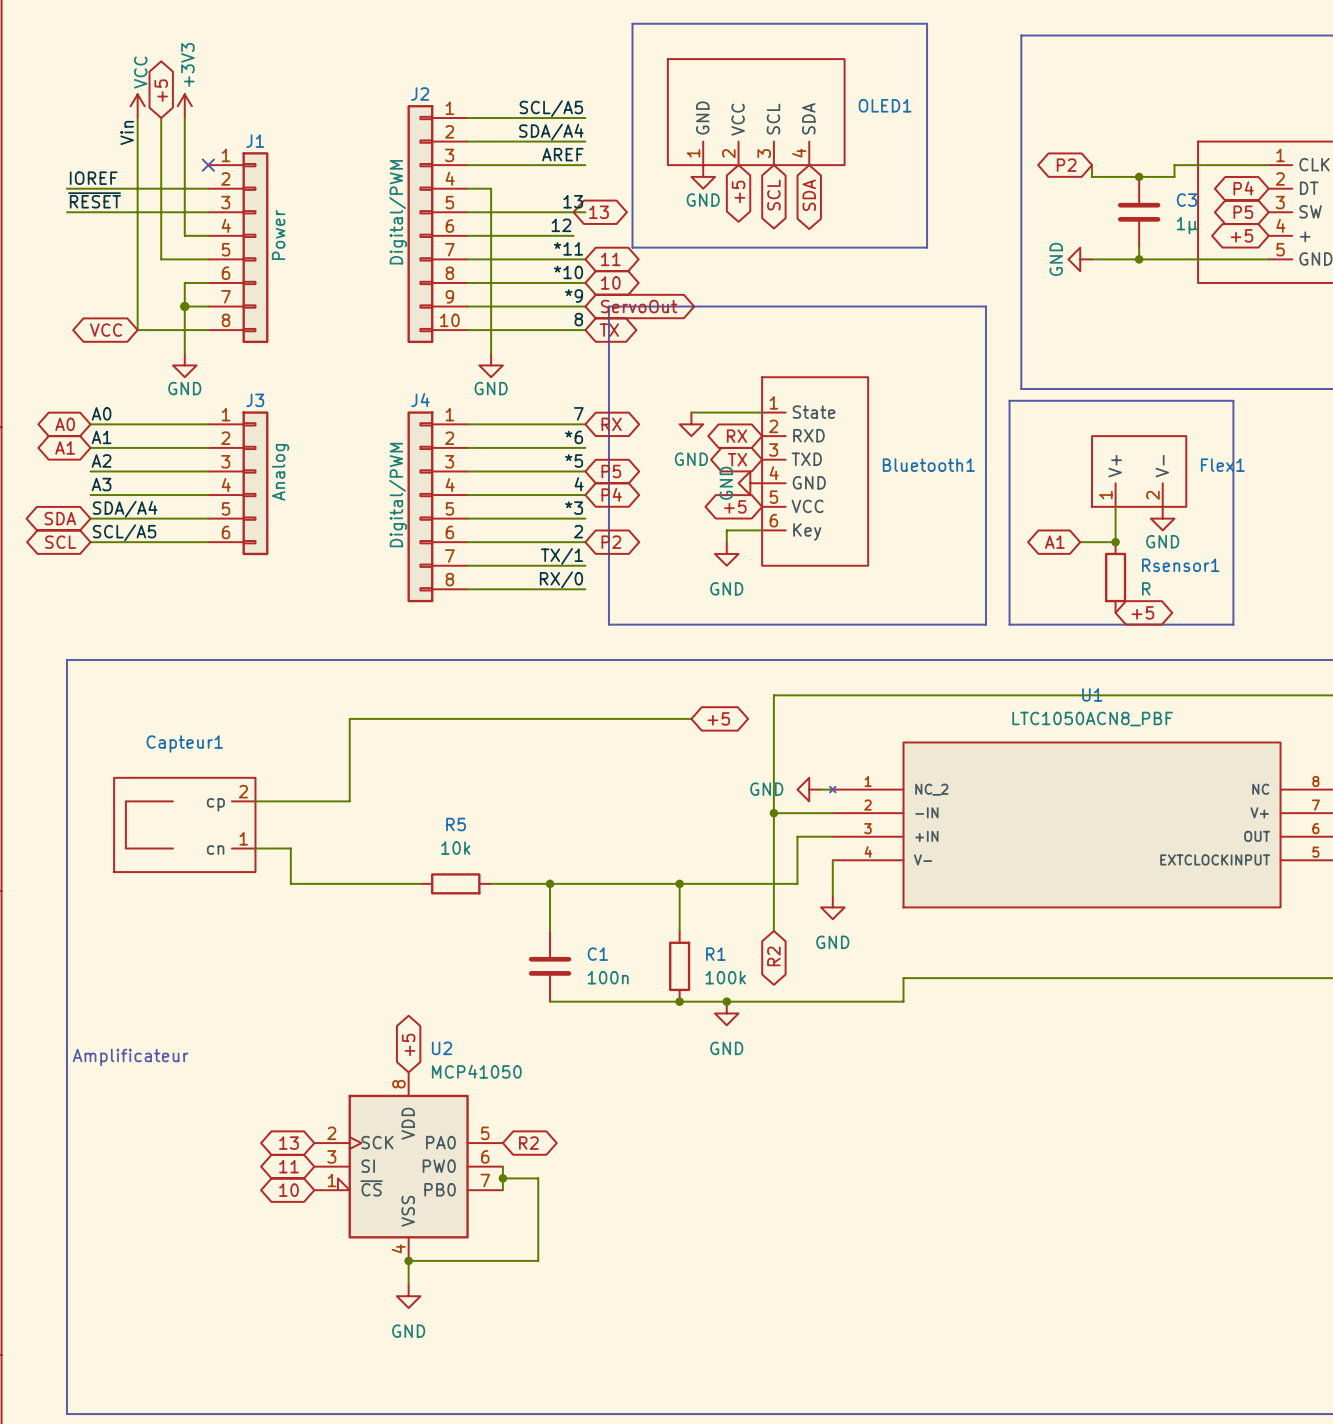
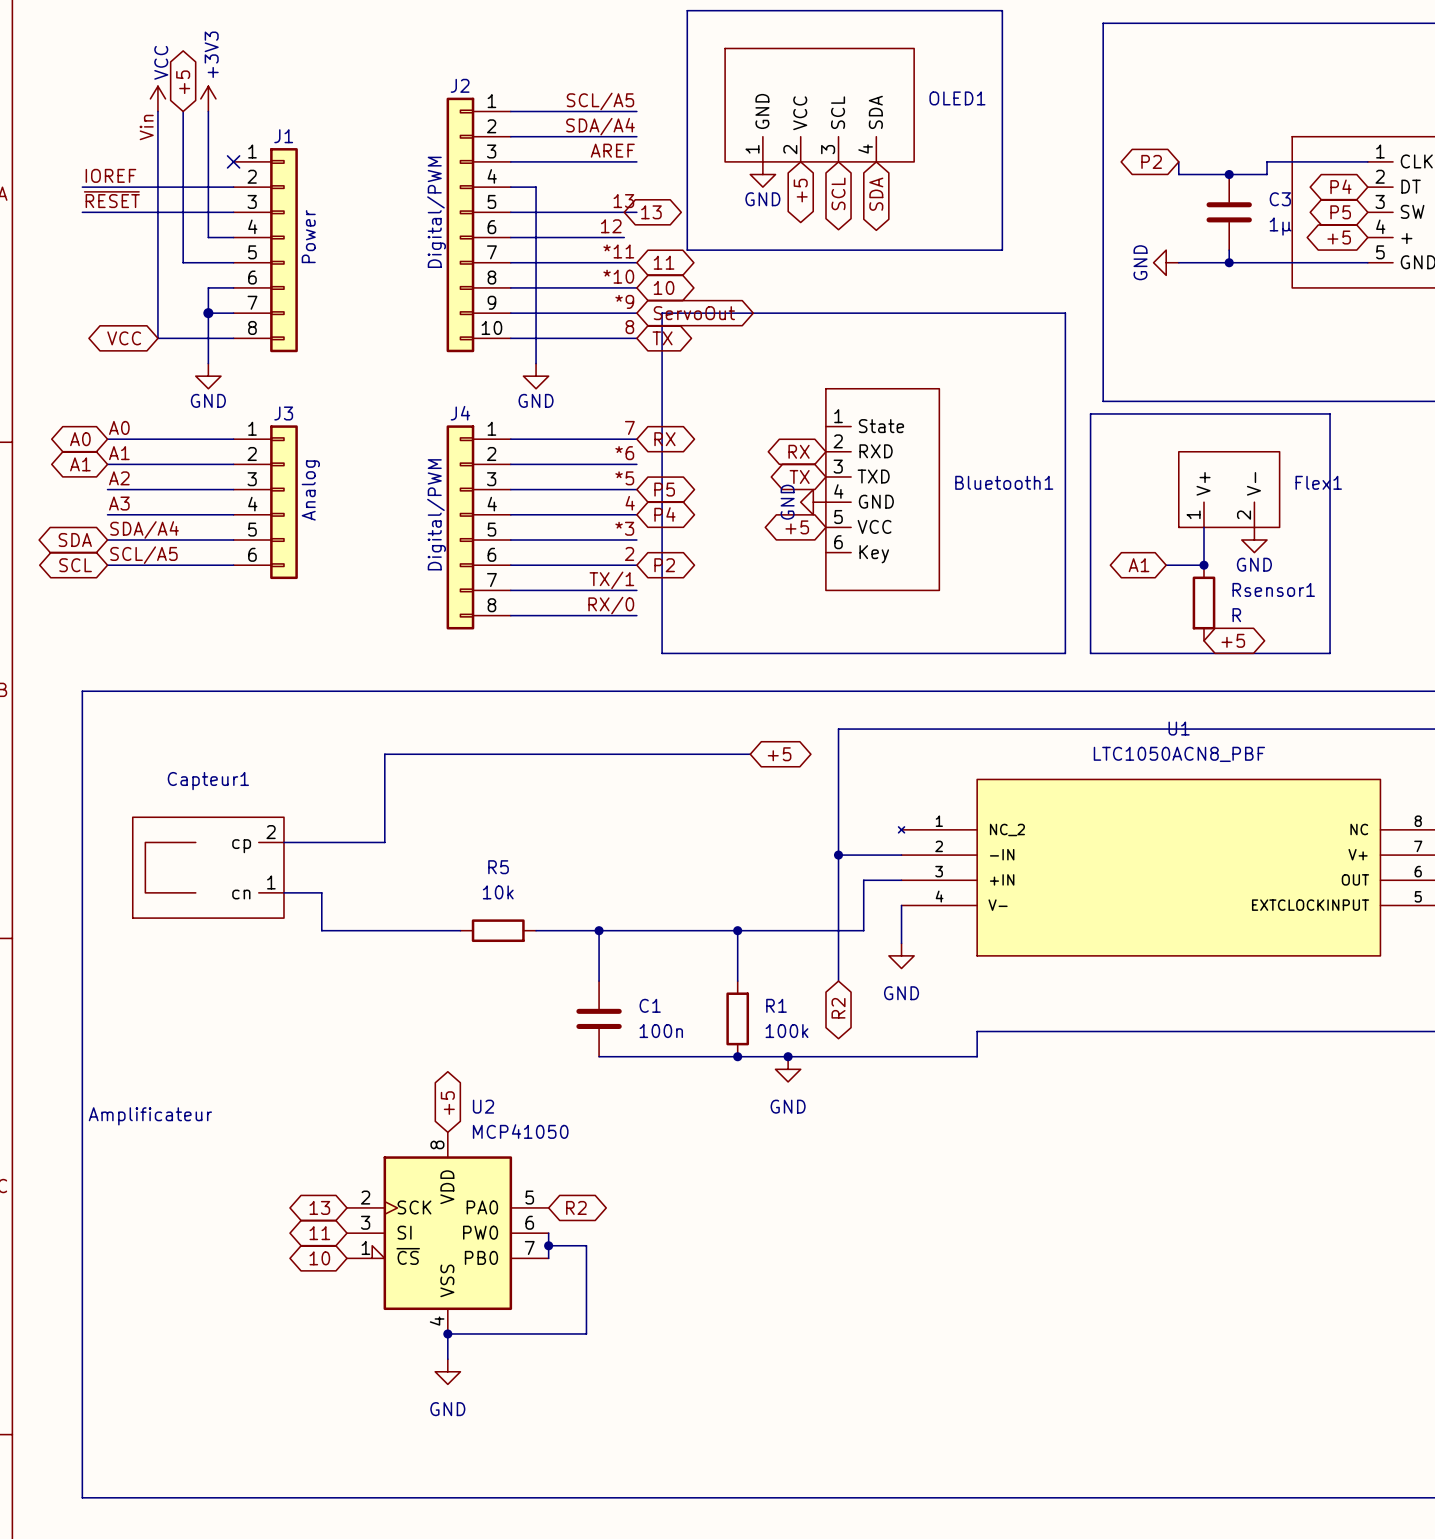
wire: (691, 412) (762, 412) -> none
power symbol: GND (691, 424) -> none
wire: (762, 530) (726, 530) (726, 542) -> none
power symbol: GND (726, 553) -> none
power symbol: GND (809, 789) -> none
wire: (821, 789) (832, 789) -> none

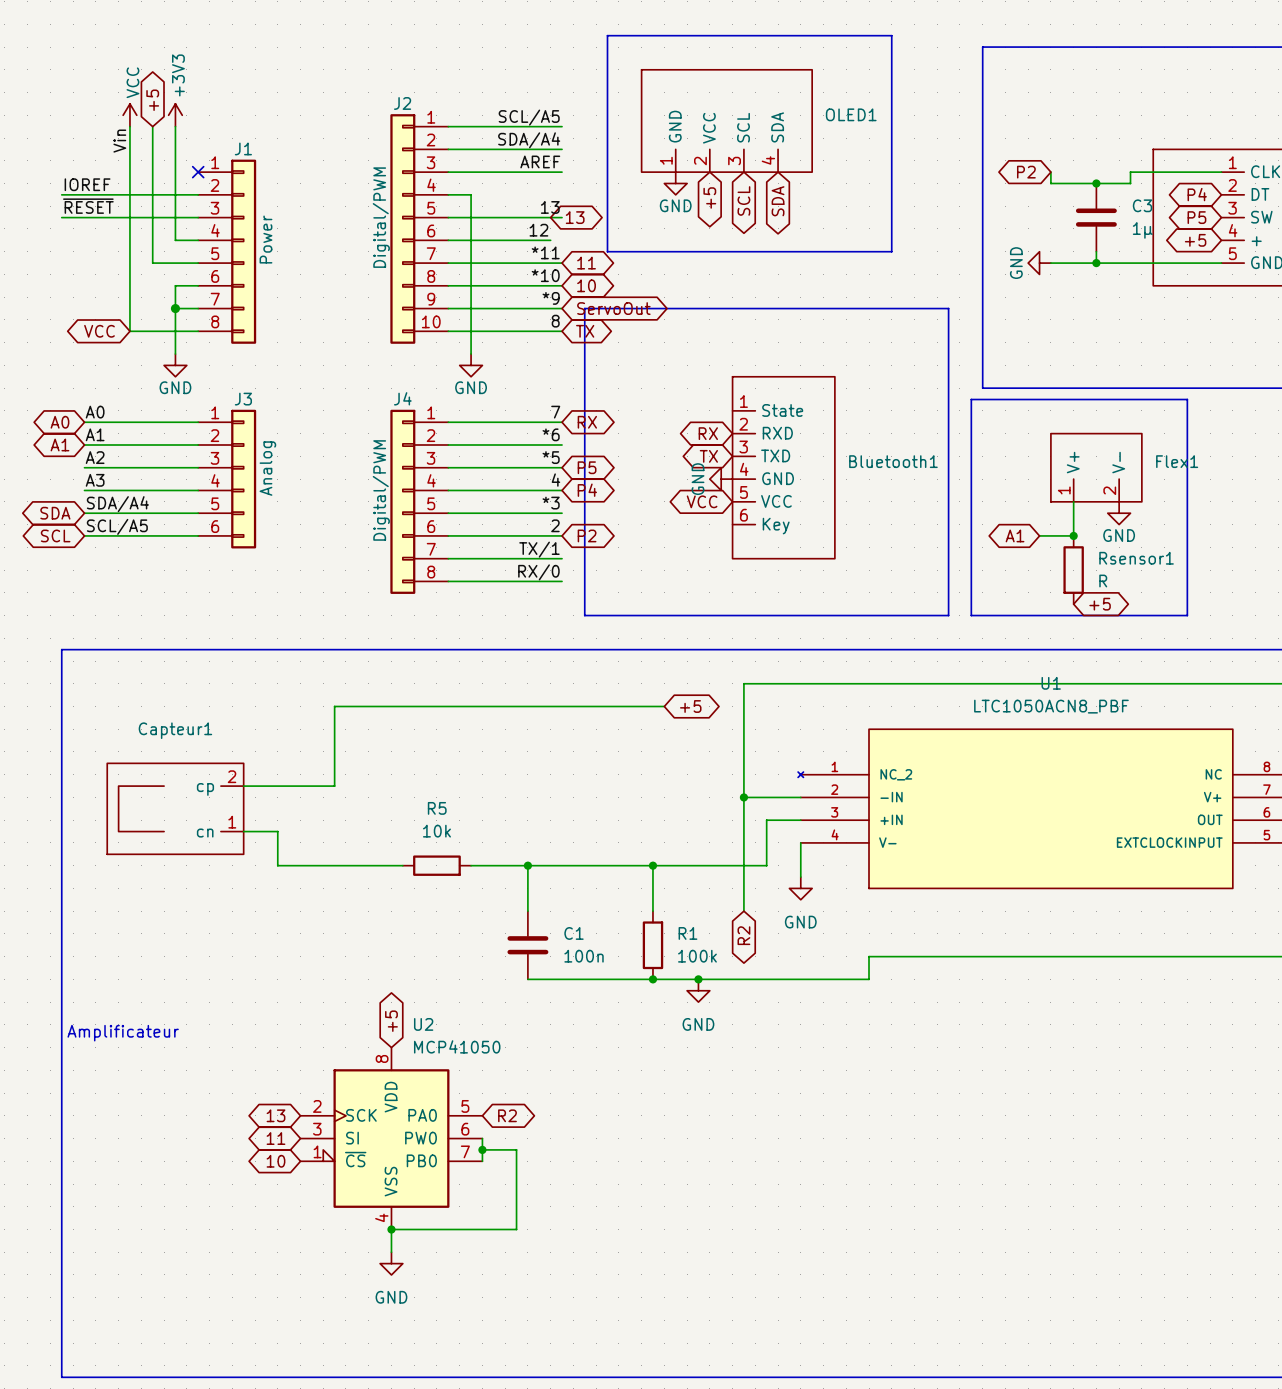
global label: +5 (797, 527) -> VCC (702, 501)

